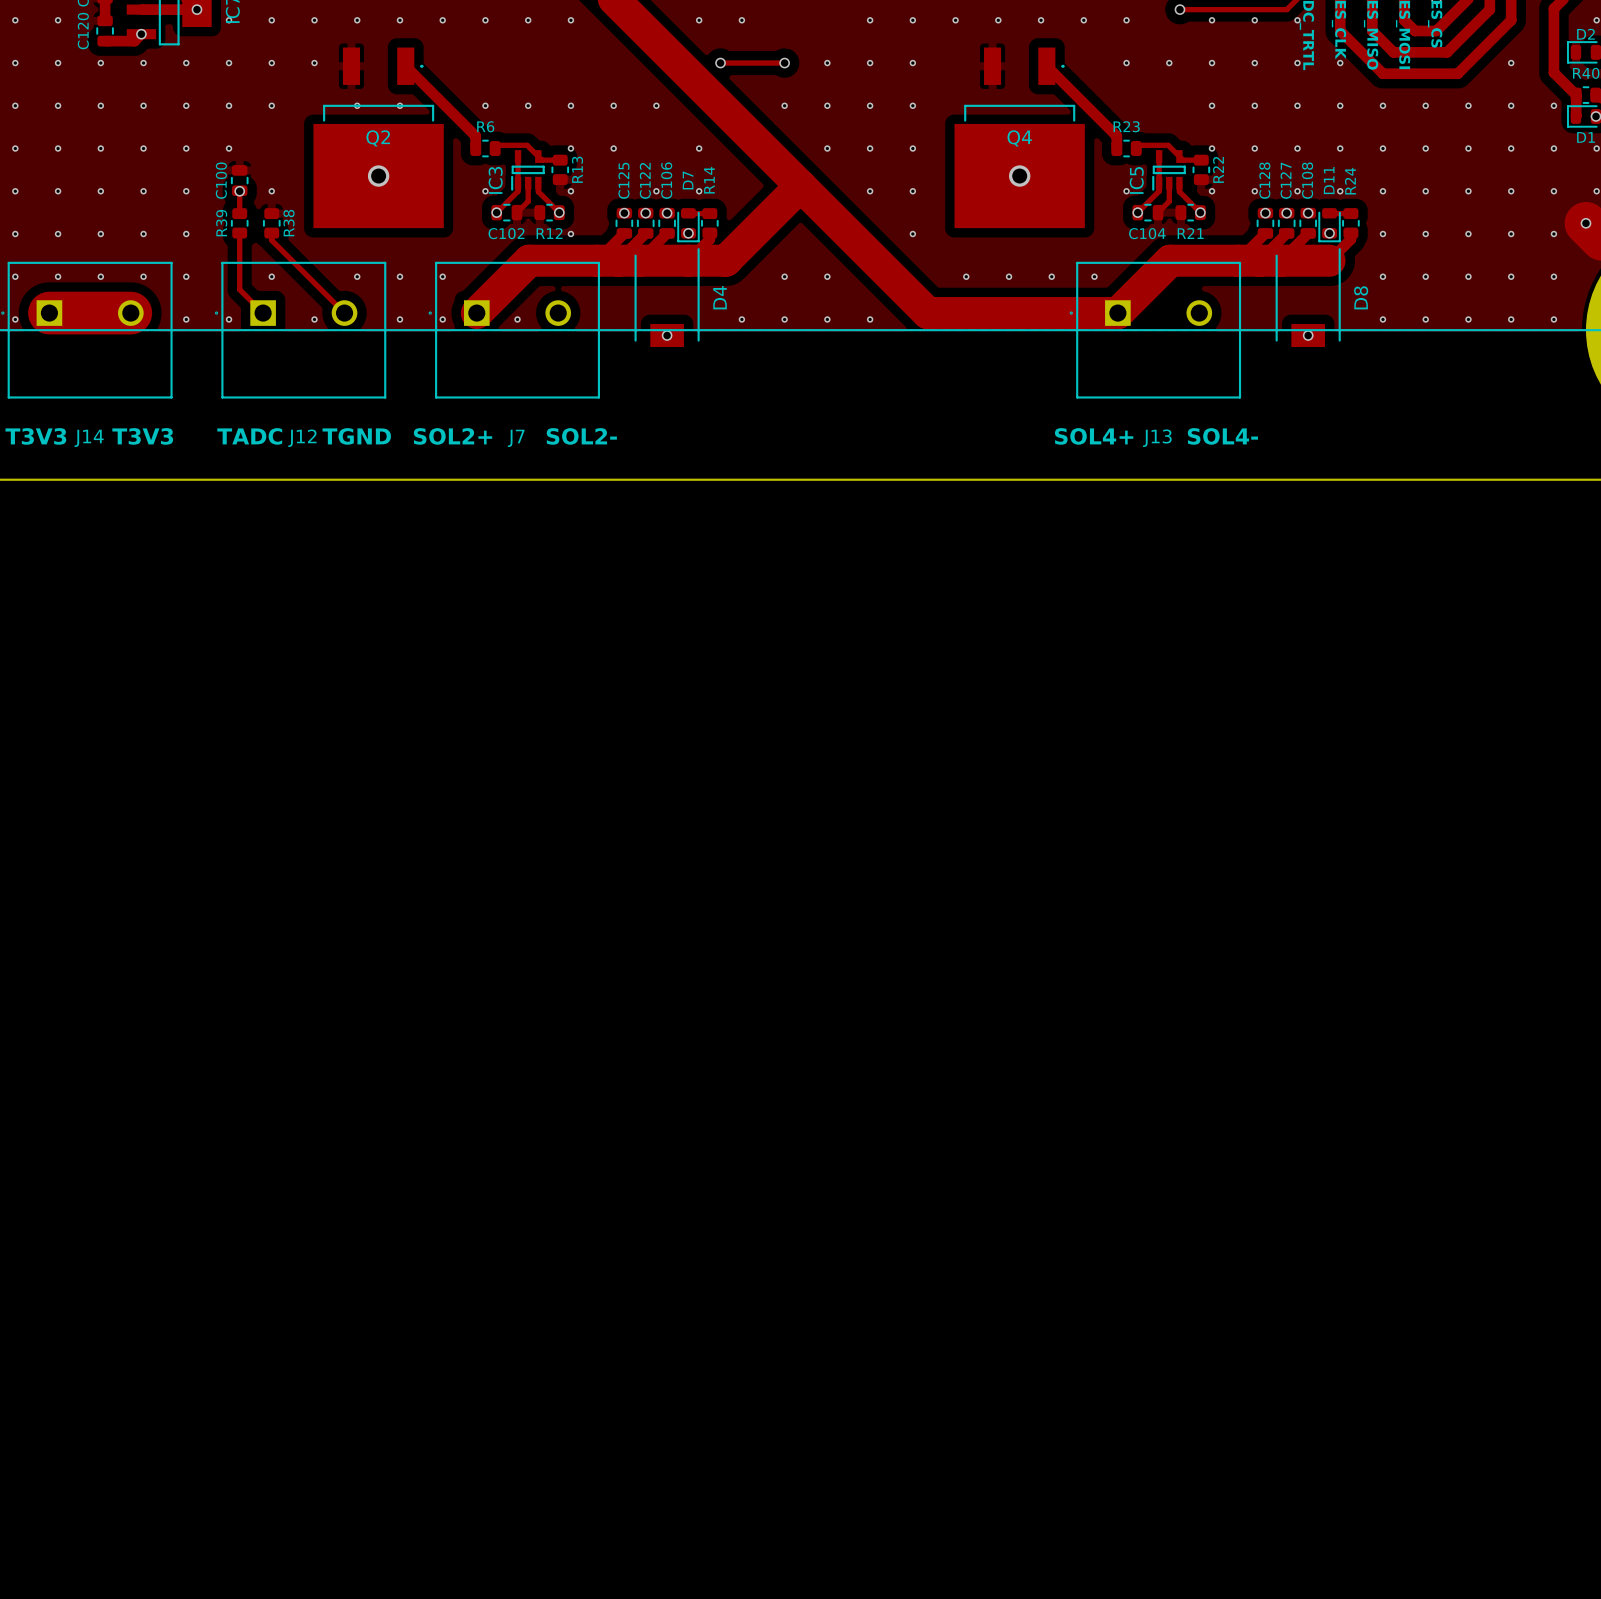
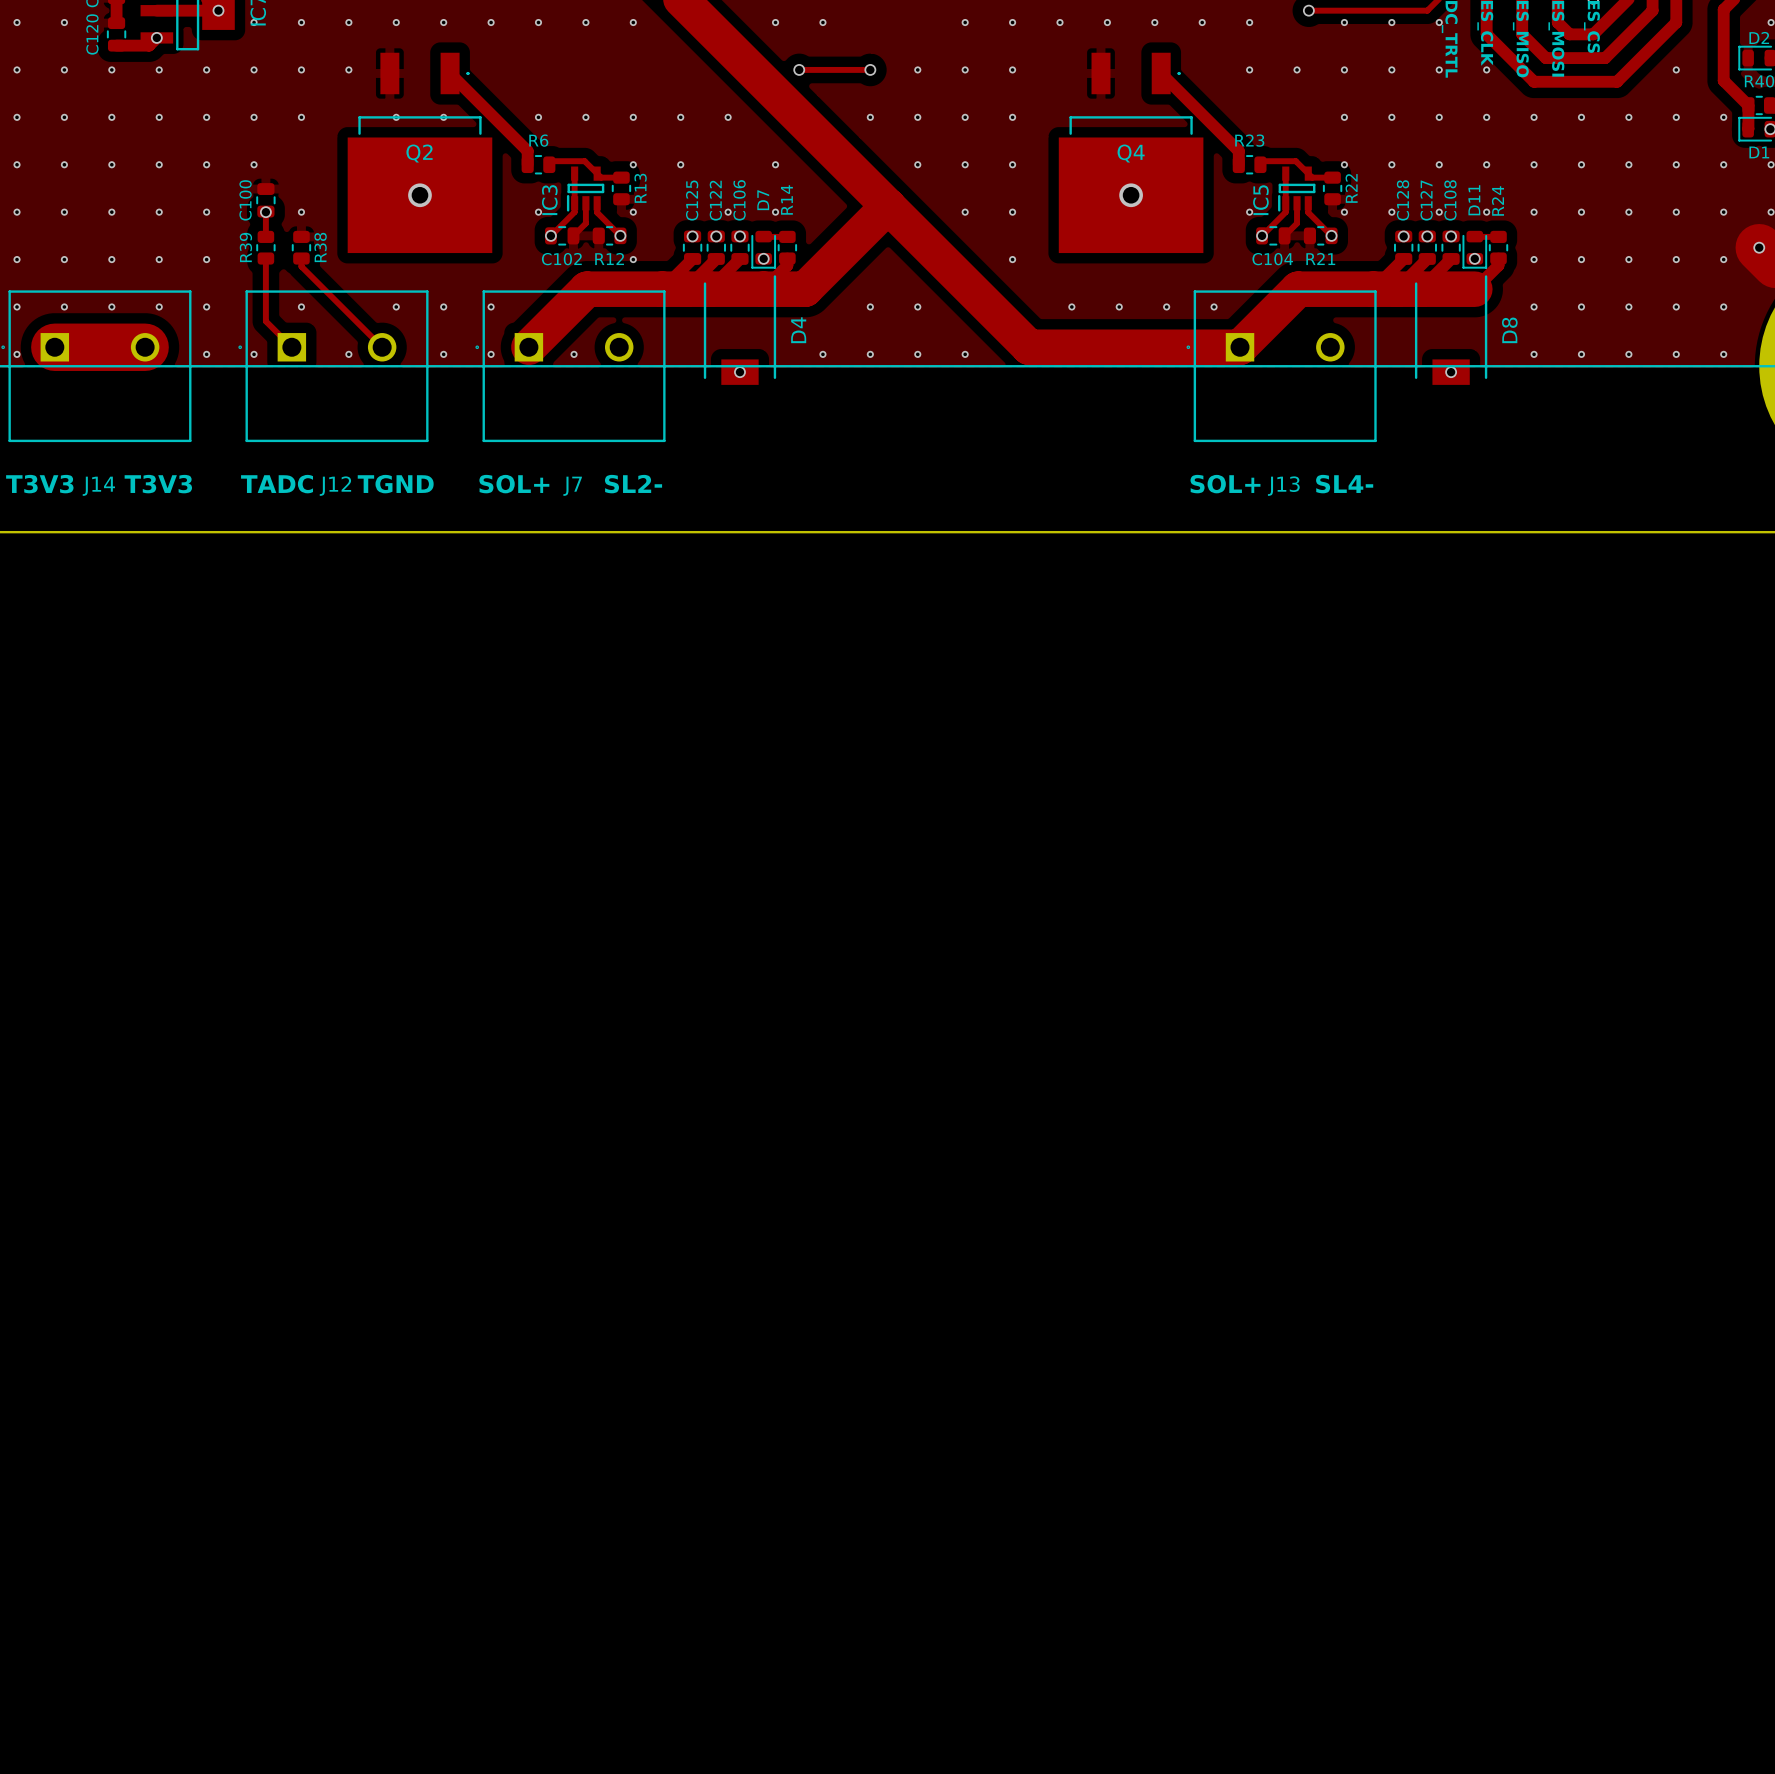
text: SOL2+ (453, 436) -> SOL+ (514, 484)
text: SOL2- (581, 436) -> SL2- (633, 484)
text: SOL4+ (1094, 436) -> SOL+ (1225, 484)
text: SOL4- (1222, 436) -> SL4- (1344, 484)

